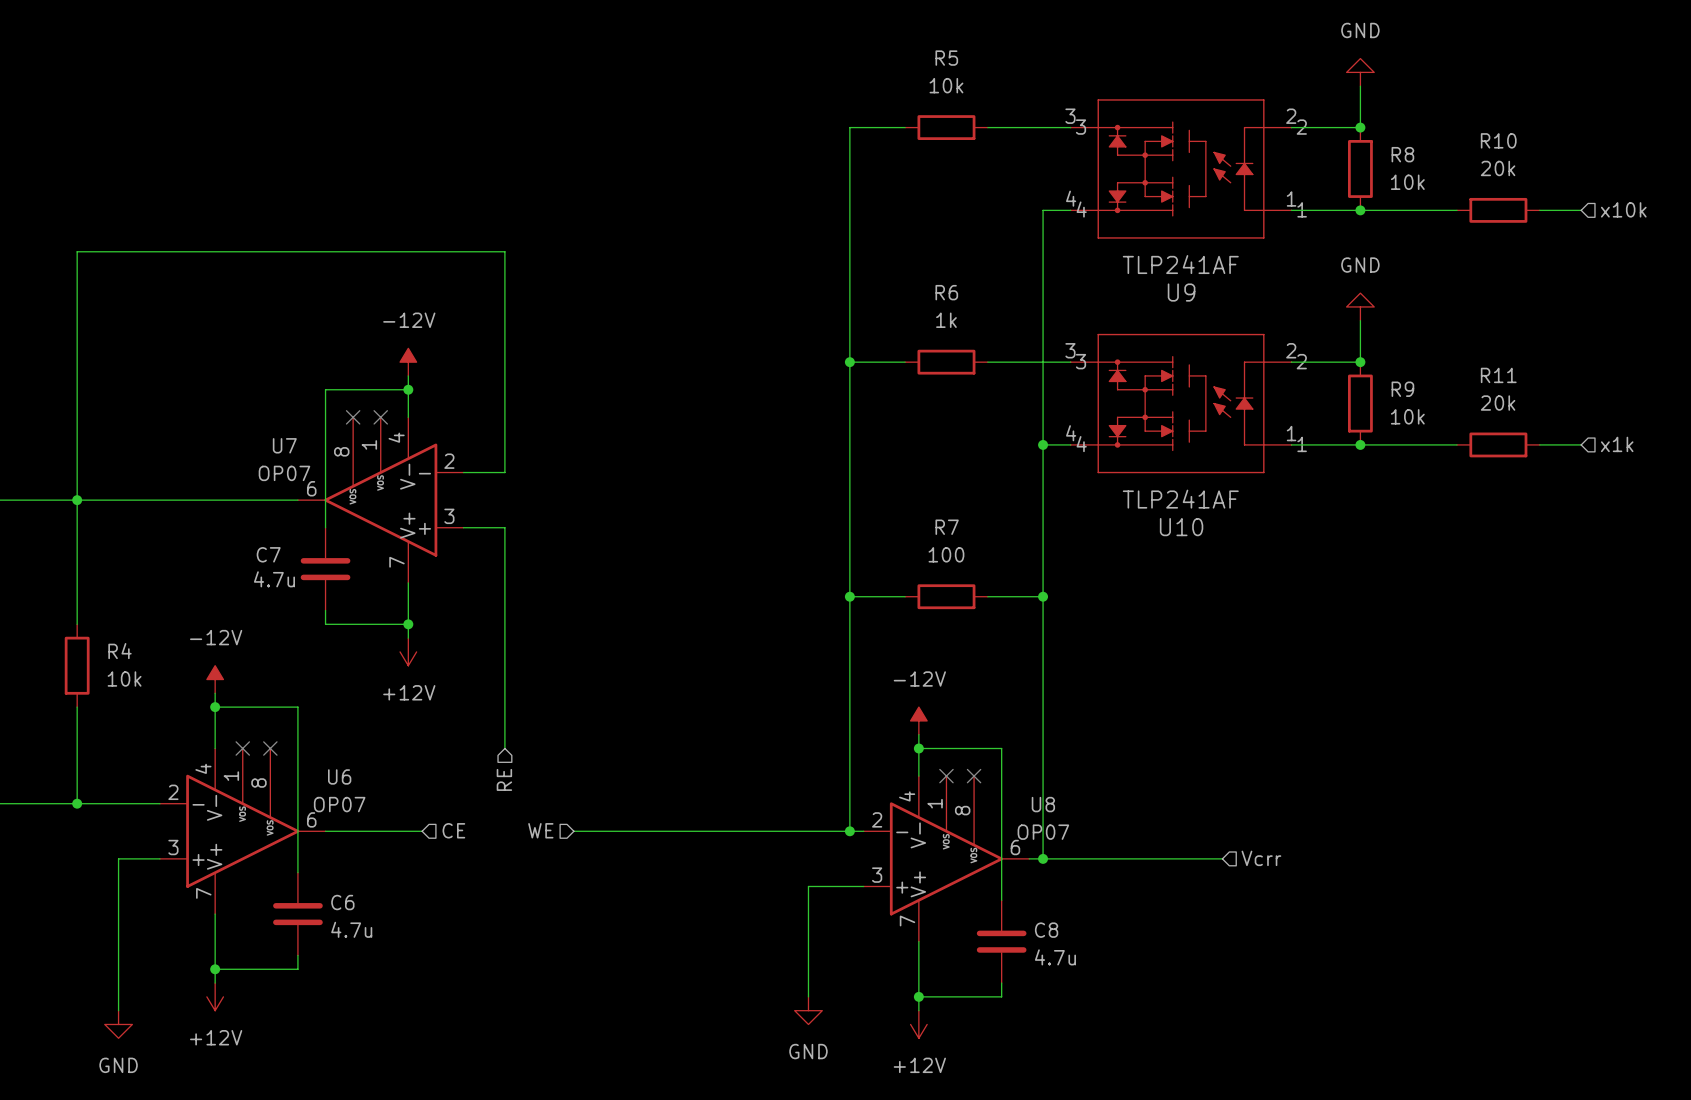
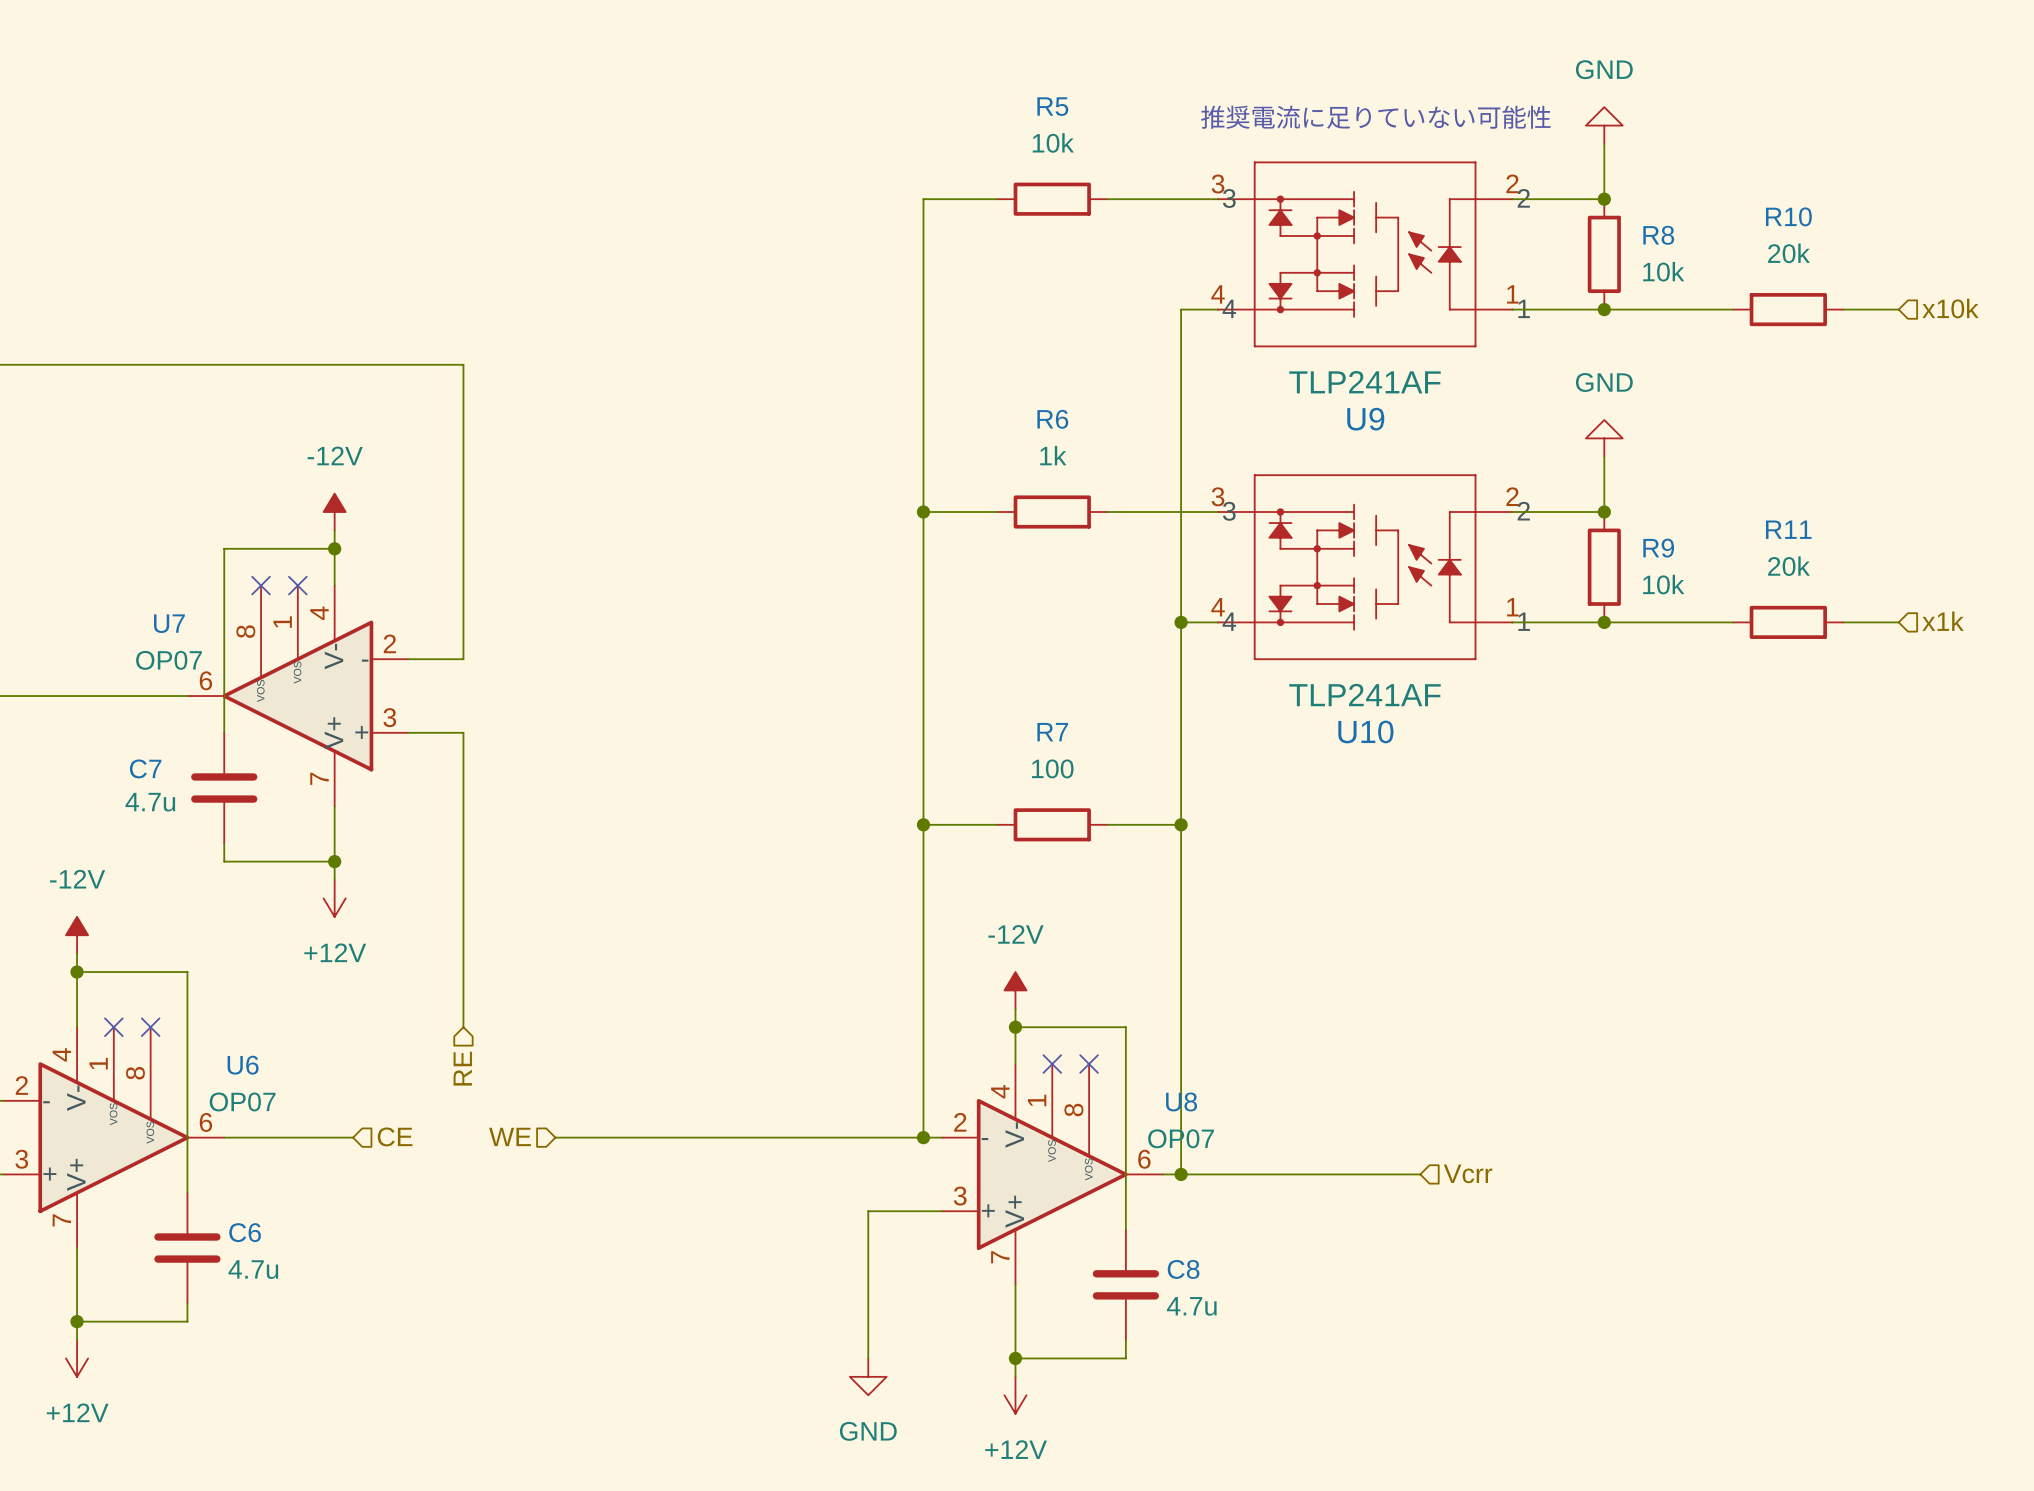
text: none -> 推奨電流に足りていない可能性 (1375, 117)

